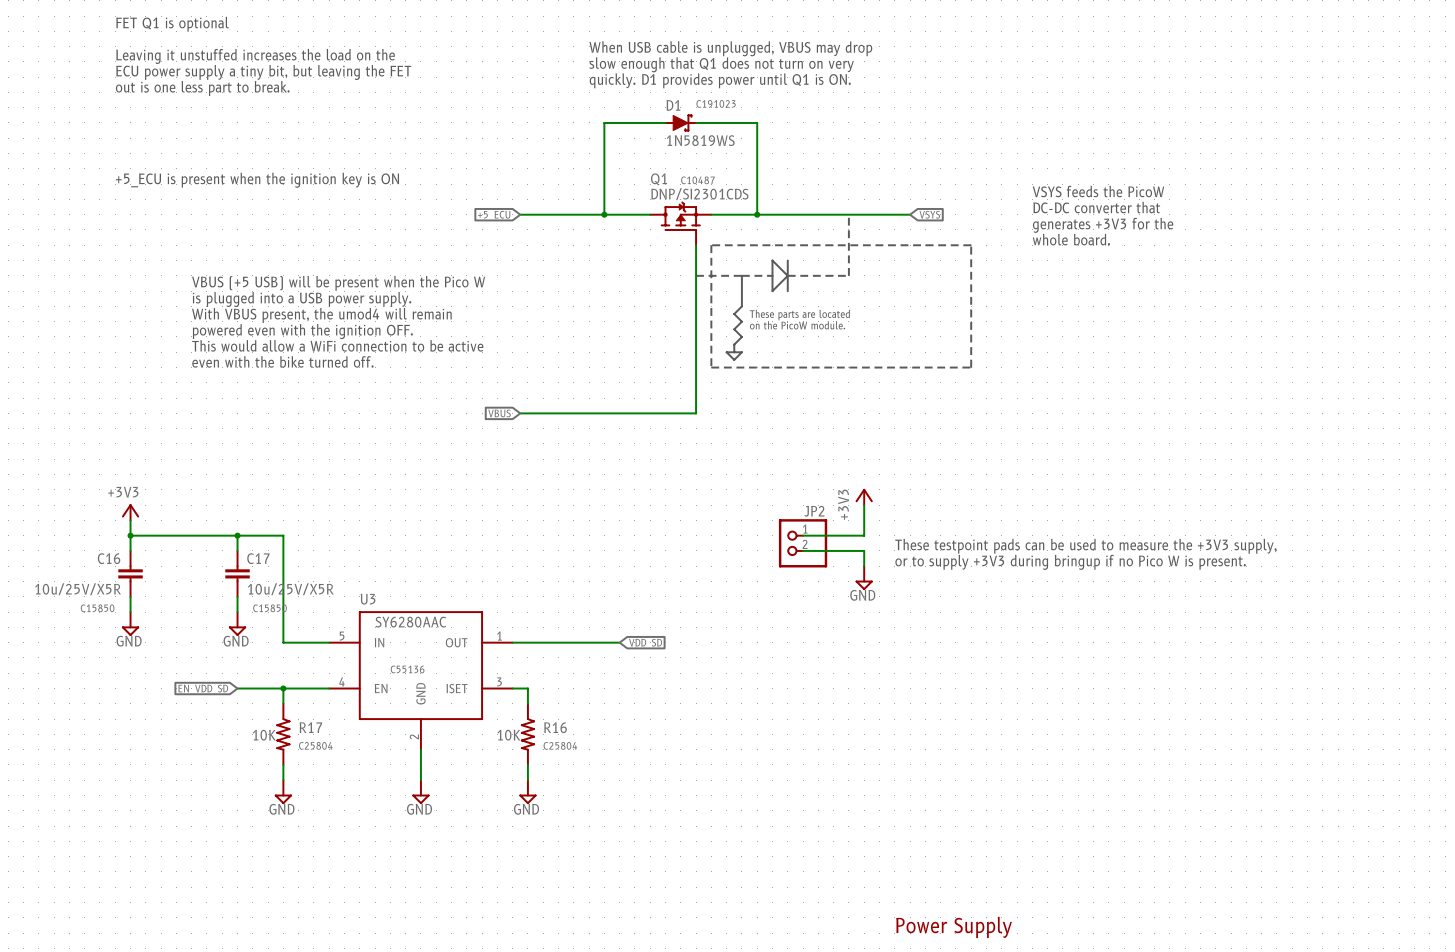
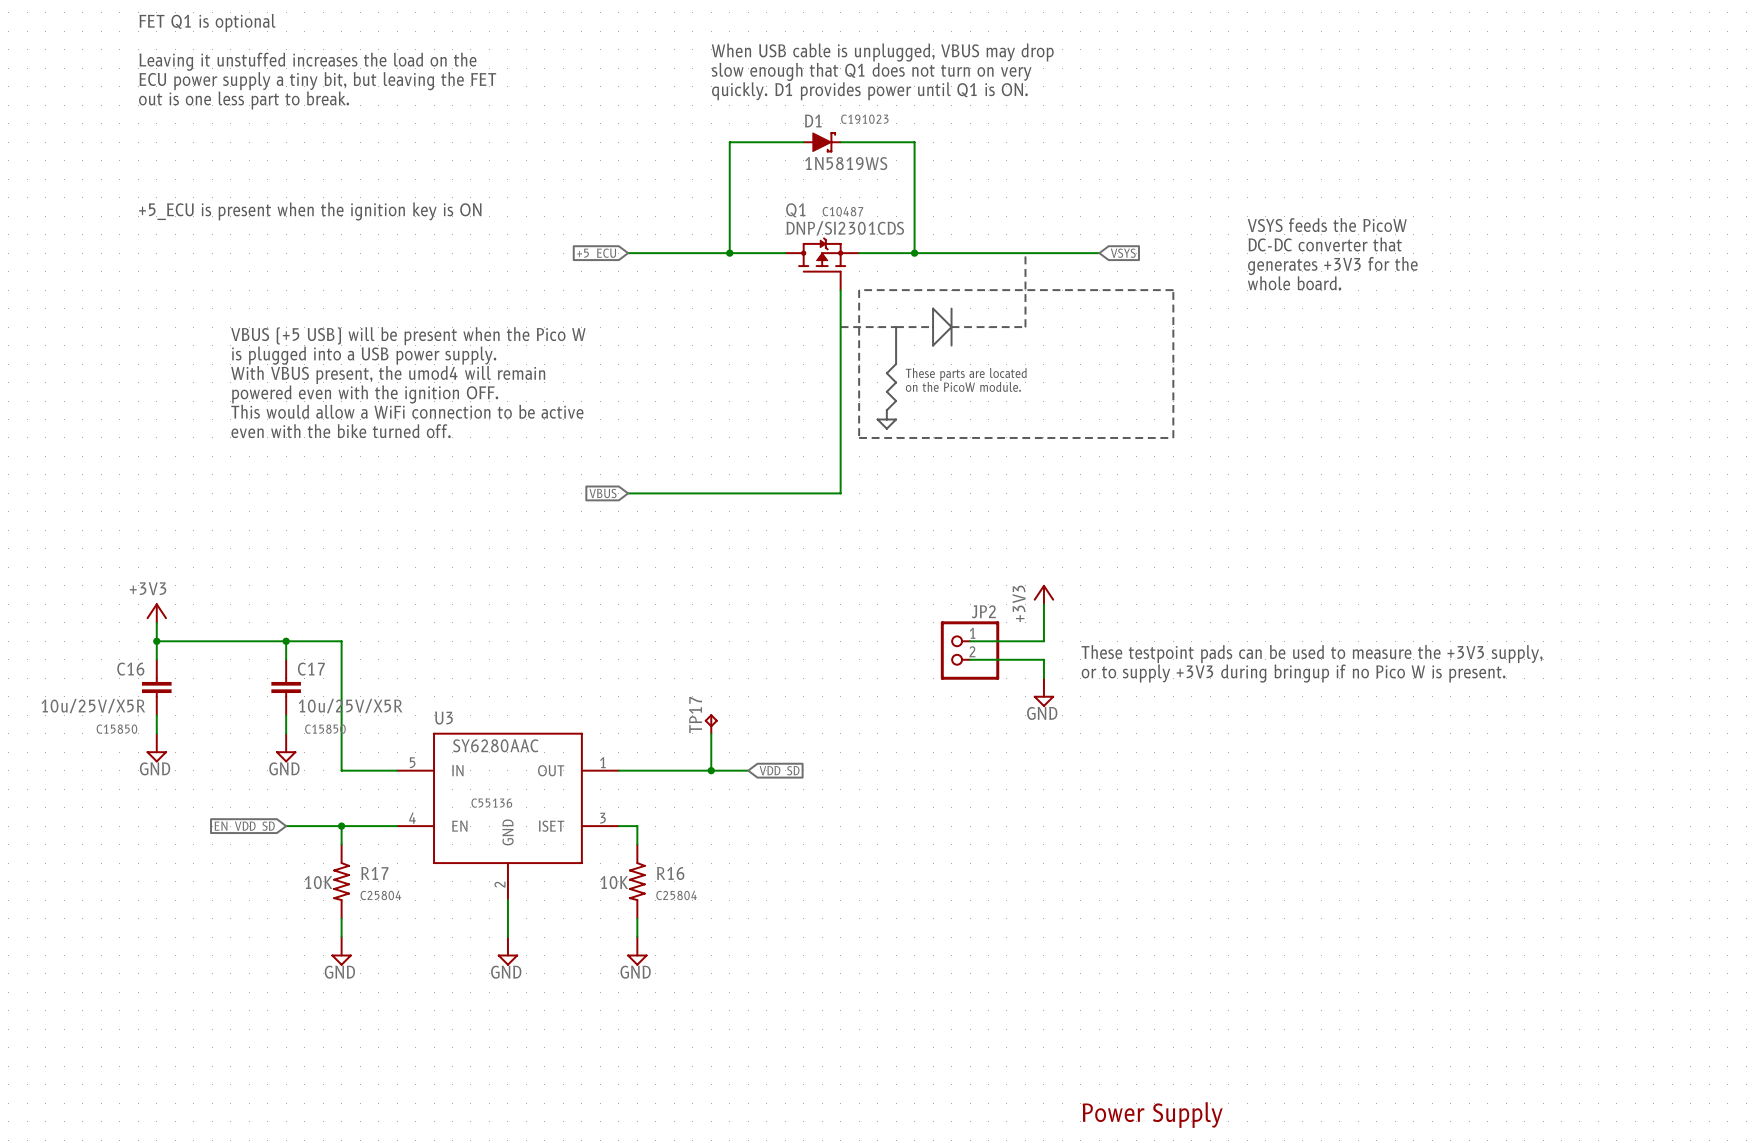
TP17: none -> (711, 724)
wire: none -> (711, 733) (711, 770)
junction: none -> (711, 770)

